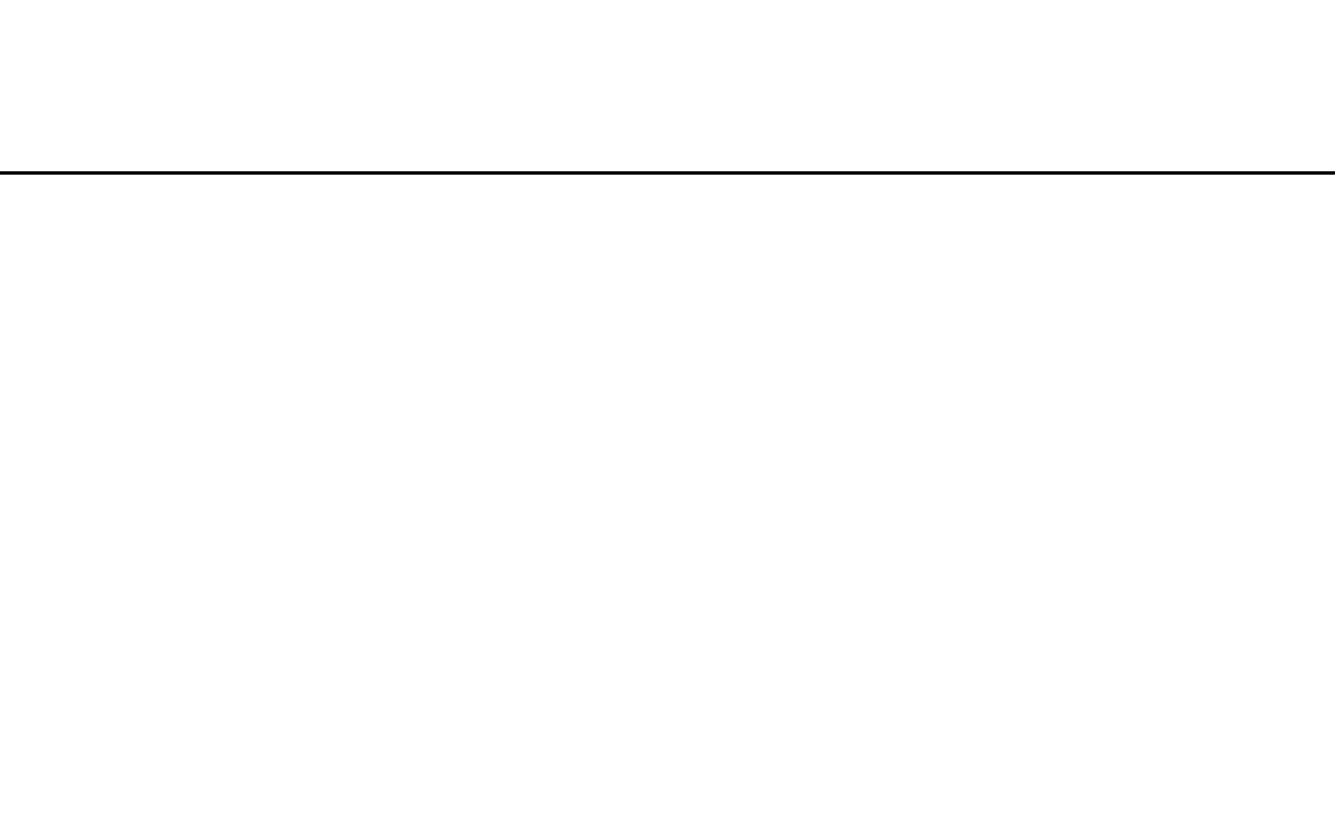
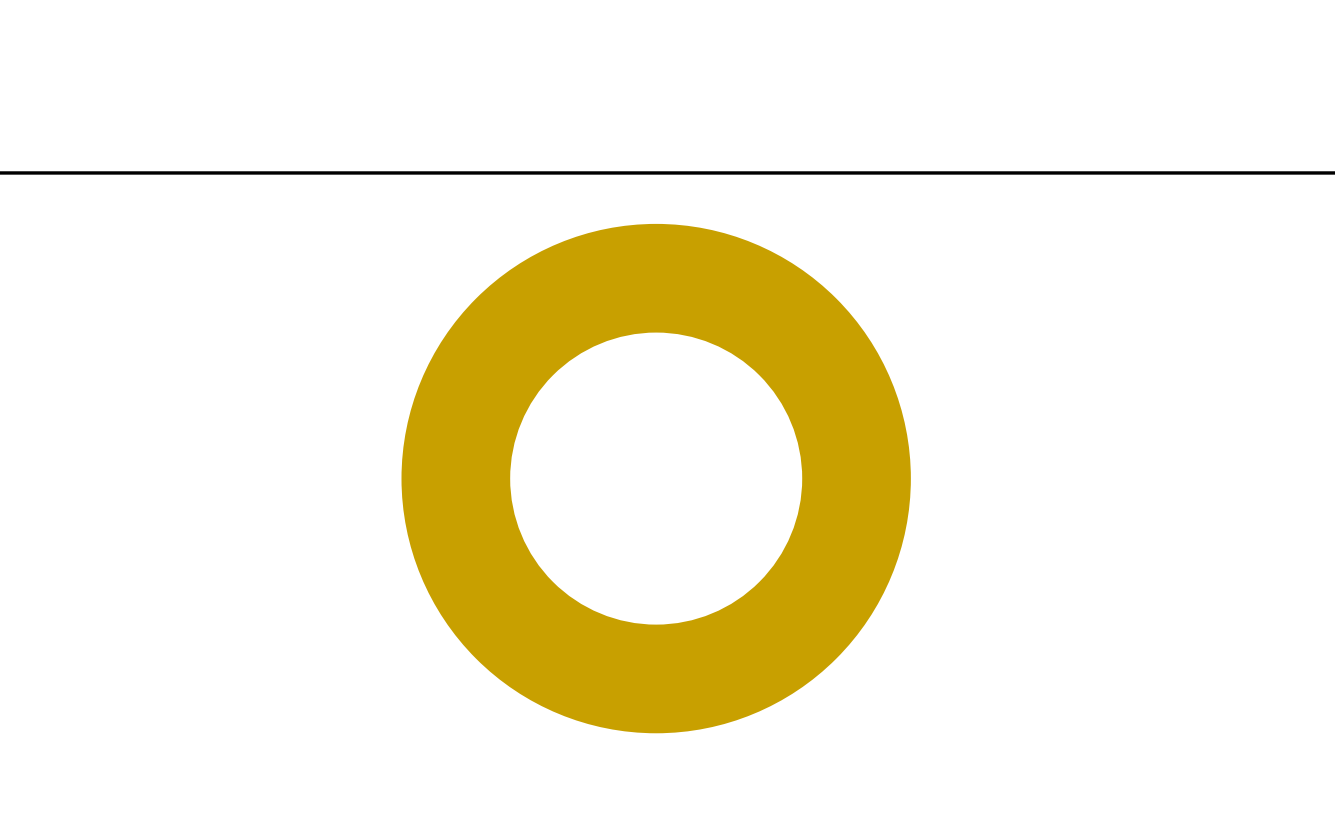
part: none -> (656, 478)

